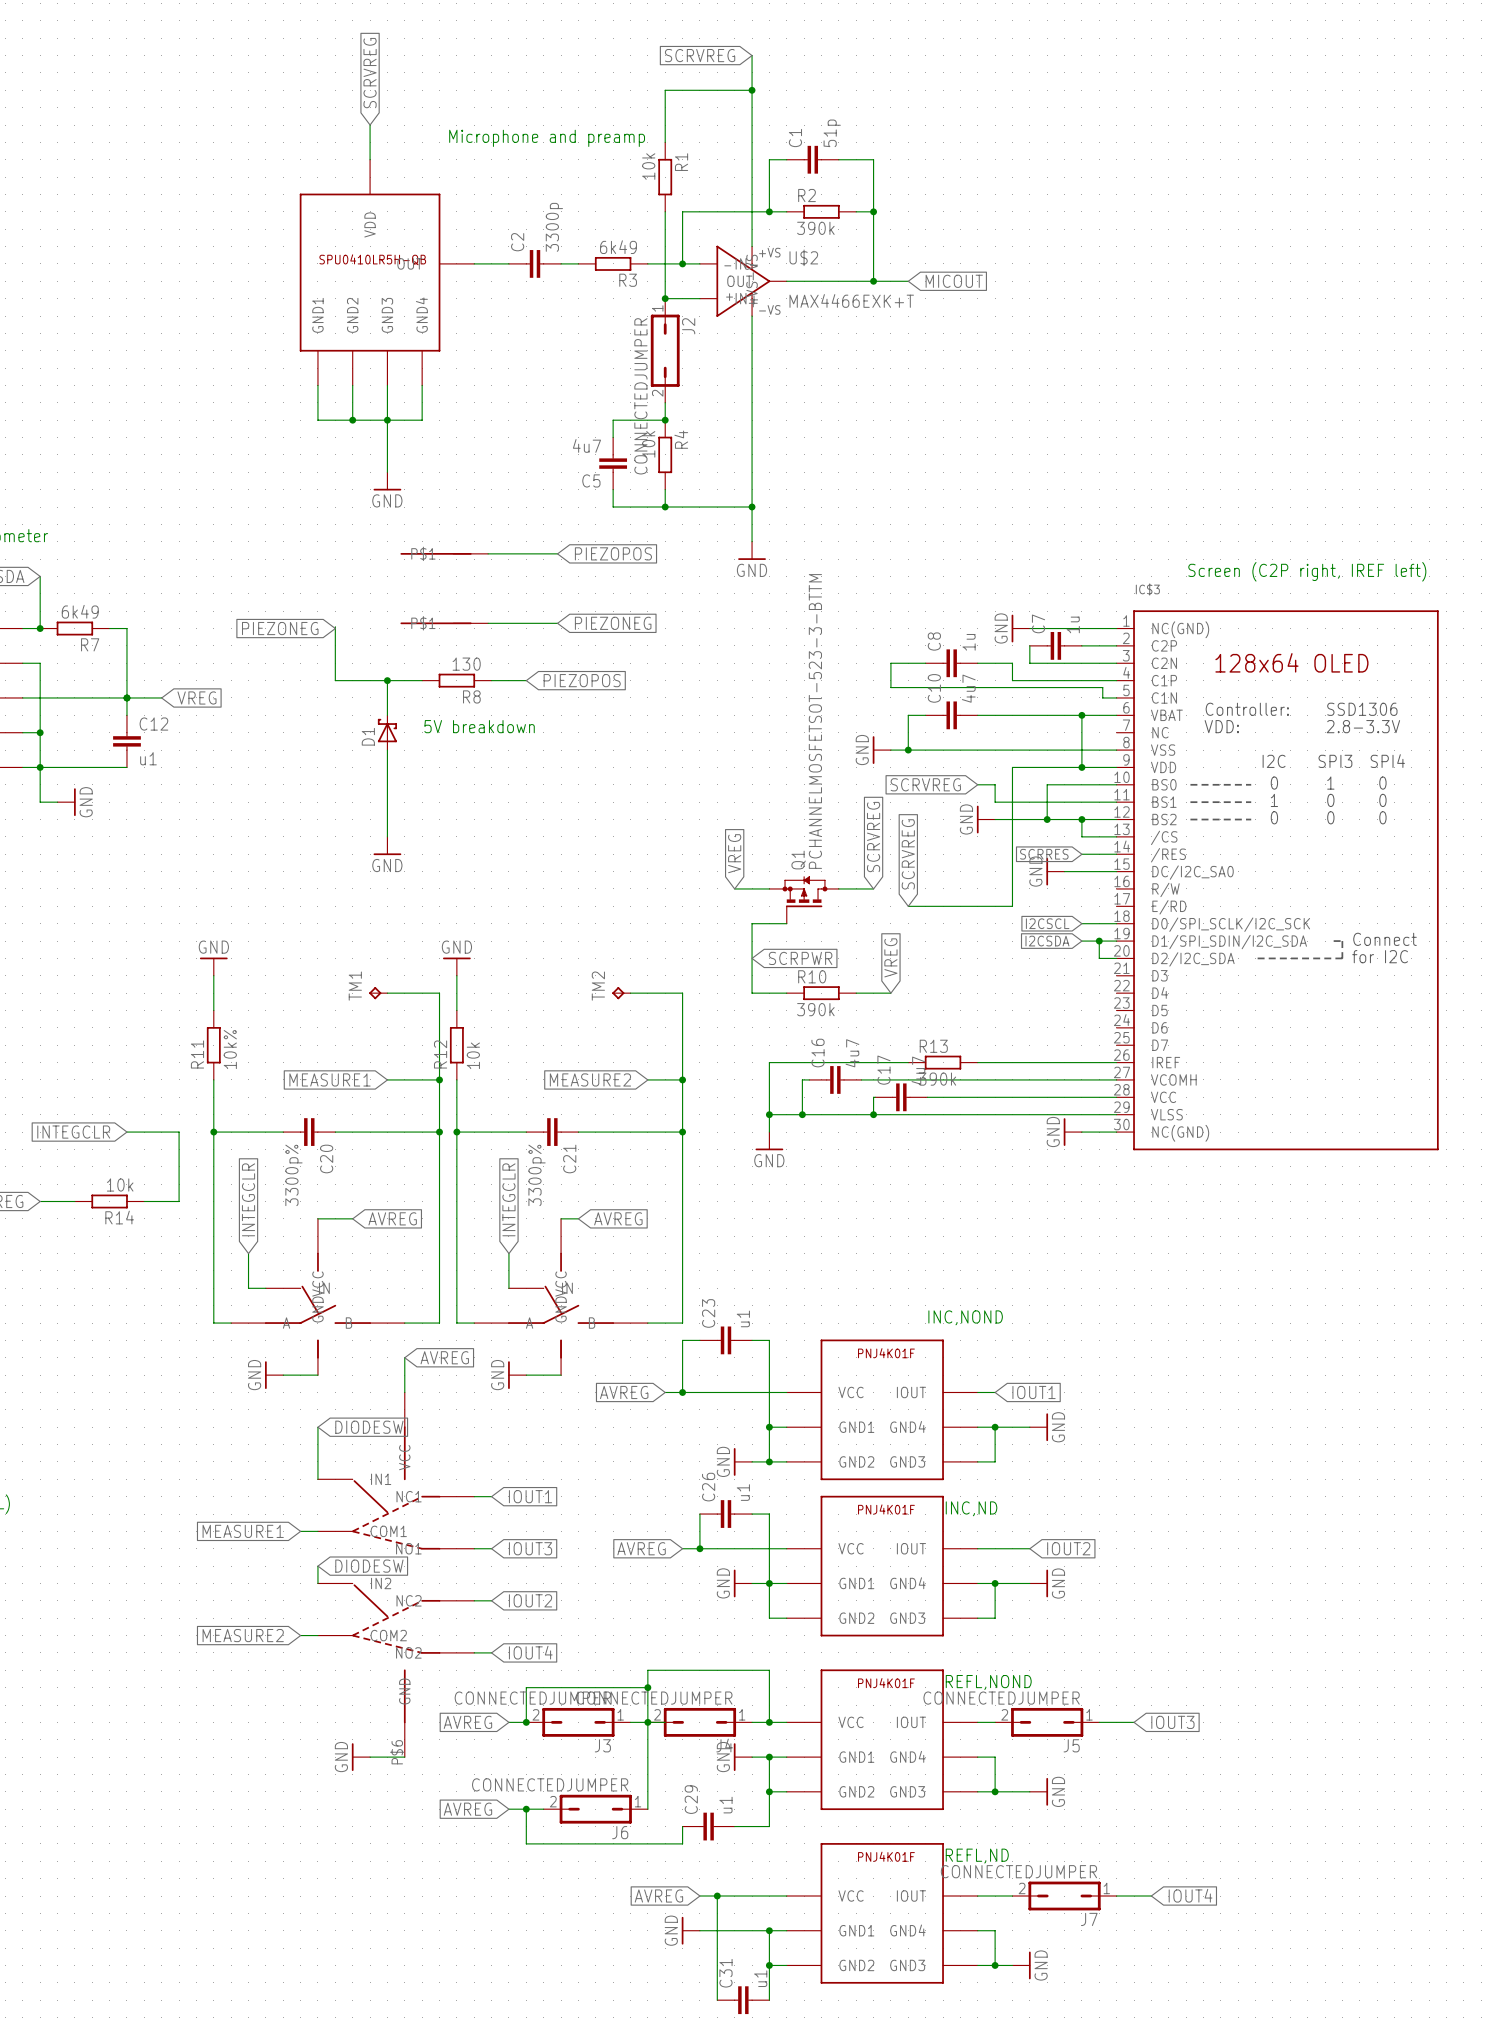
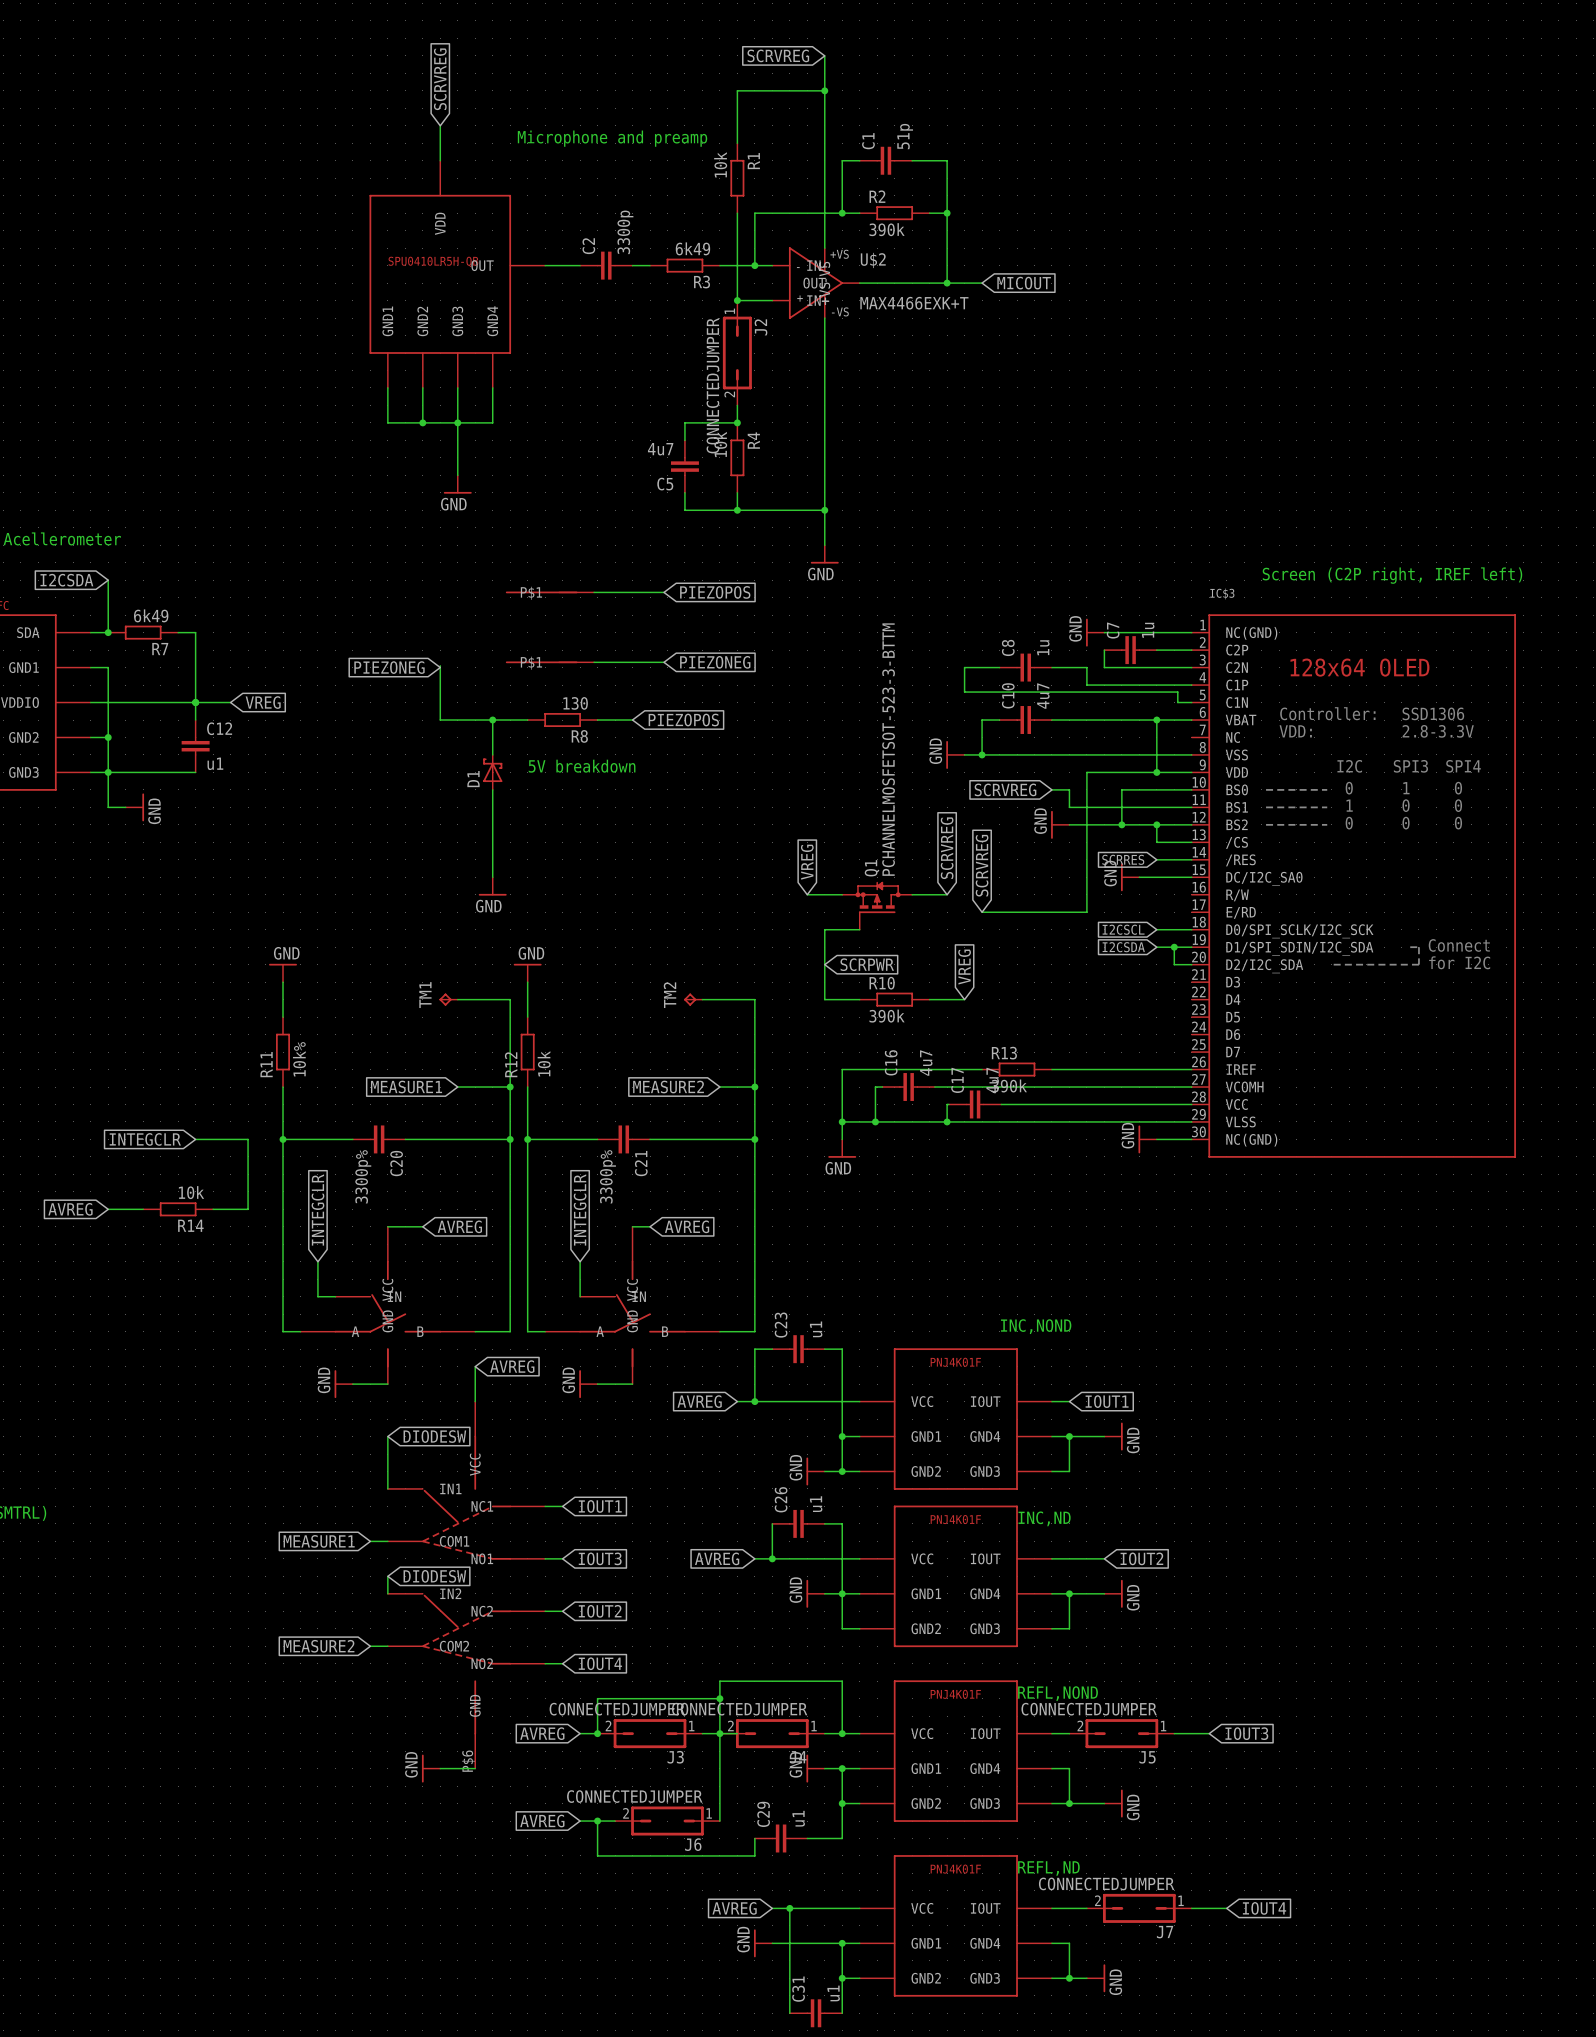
part: (444, 553) -> none
wire: (488, 553) (557, 553) -> (594, 592) (663, 592)
global label position: PIEZOPOS (613, 553) -> PIEZOPOS (715, 592)
part: none -> (549, 592)
part: (444, 623) -> none
wire: (488, 623) (557, 623) -> (594, 662) (663, 662)
global label position: PIEZONEG (613, 623) -> PIEZONEG (715, 662)
wire: (335, 626) (335, 680) (422, 680) -> (440, 665) (440, 720) (527, 720)
global label position: PIEZONEG (280, 628) -> PIEZONEG (389, 667)
part: none -> (549, 662)
wire: (387, 680) (387, 715) -> (492, 720) (492, 754)
junction: (387, 680) -> none
R8 position: (456, 680) -> (562, 720)
wire: (491, 680) (526, 680) -> (597, 720) (632, 720)
global label position: PIEZOPOS (582, 680) -> PIEZOPOS (683, 720)
junction: none -> (492, 720)
text position: 5V breakdown (479, 726) -> 5V breakdown (582, 766)
D1 position: (387, 732) -> (492, 772)
wire: (387, 750) (387, 836) -> (492, 789) (492, 877)
power symbol position: GND (387, 846) -> GND (492, 886)

